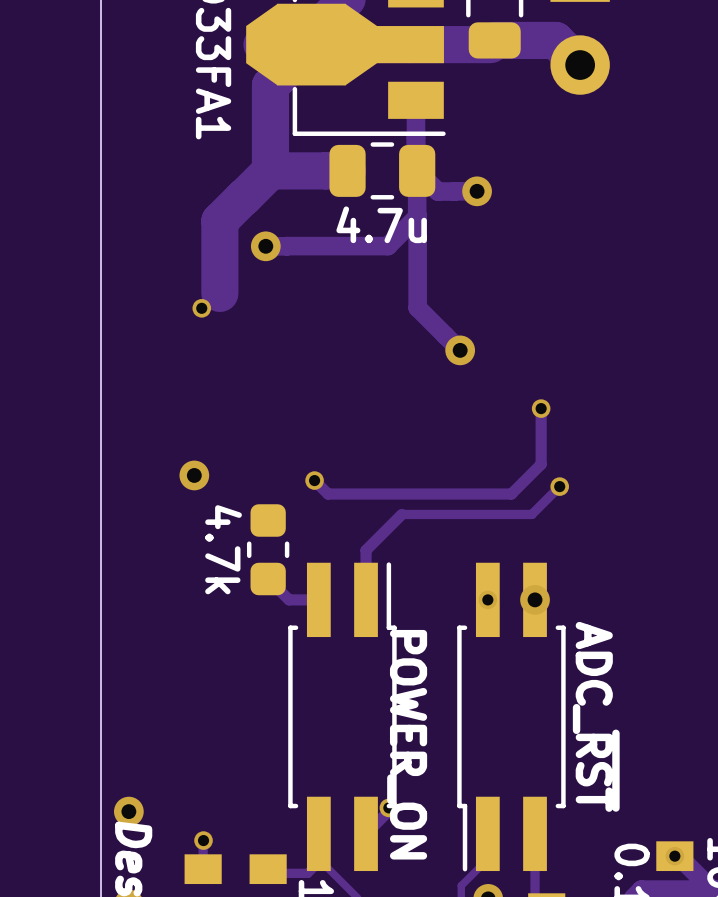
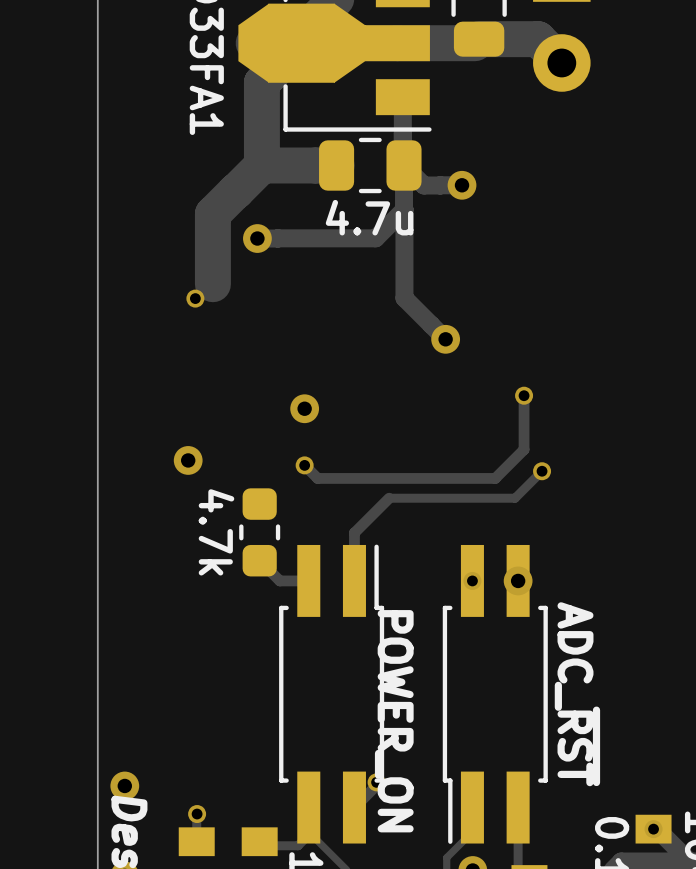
via: none -> (304, 408)

